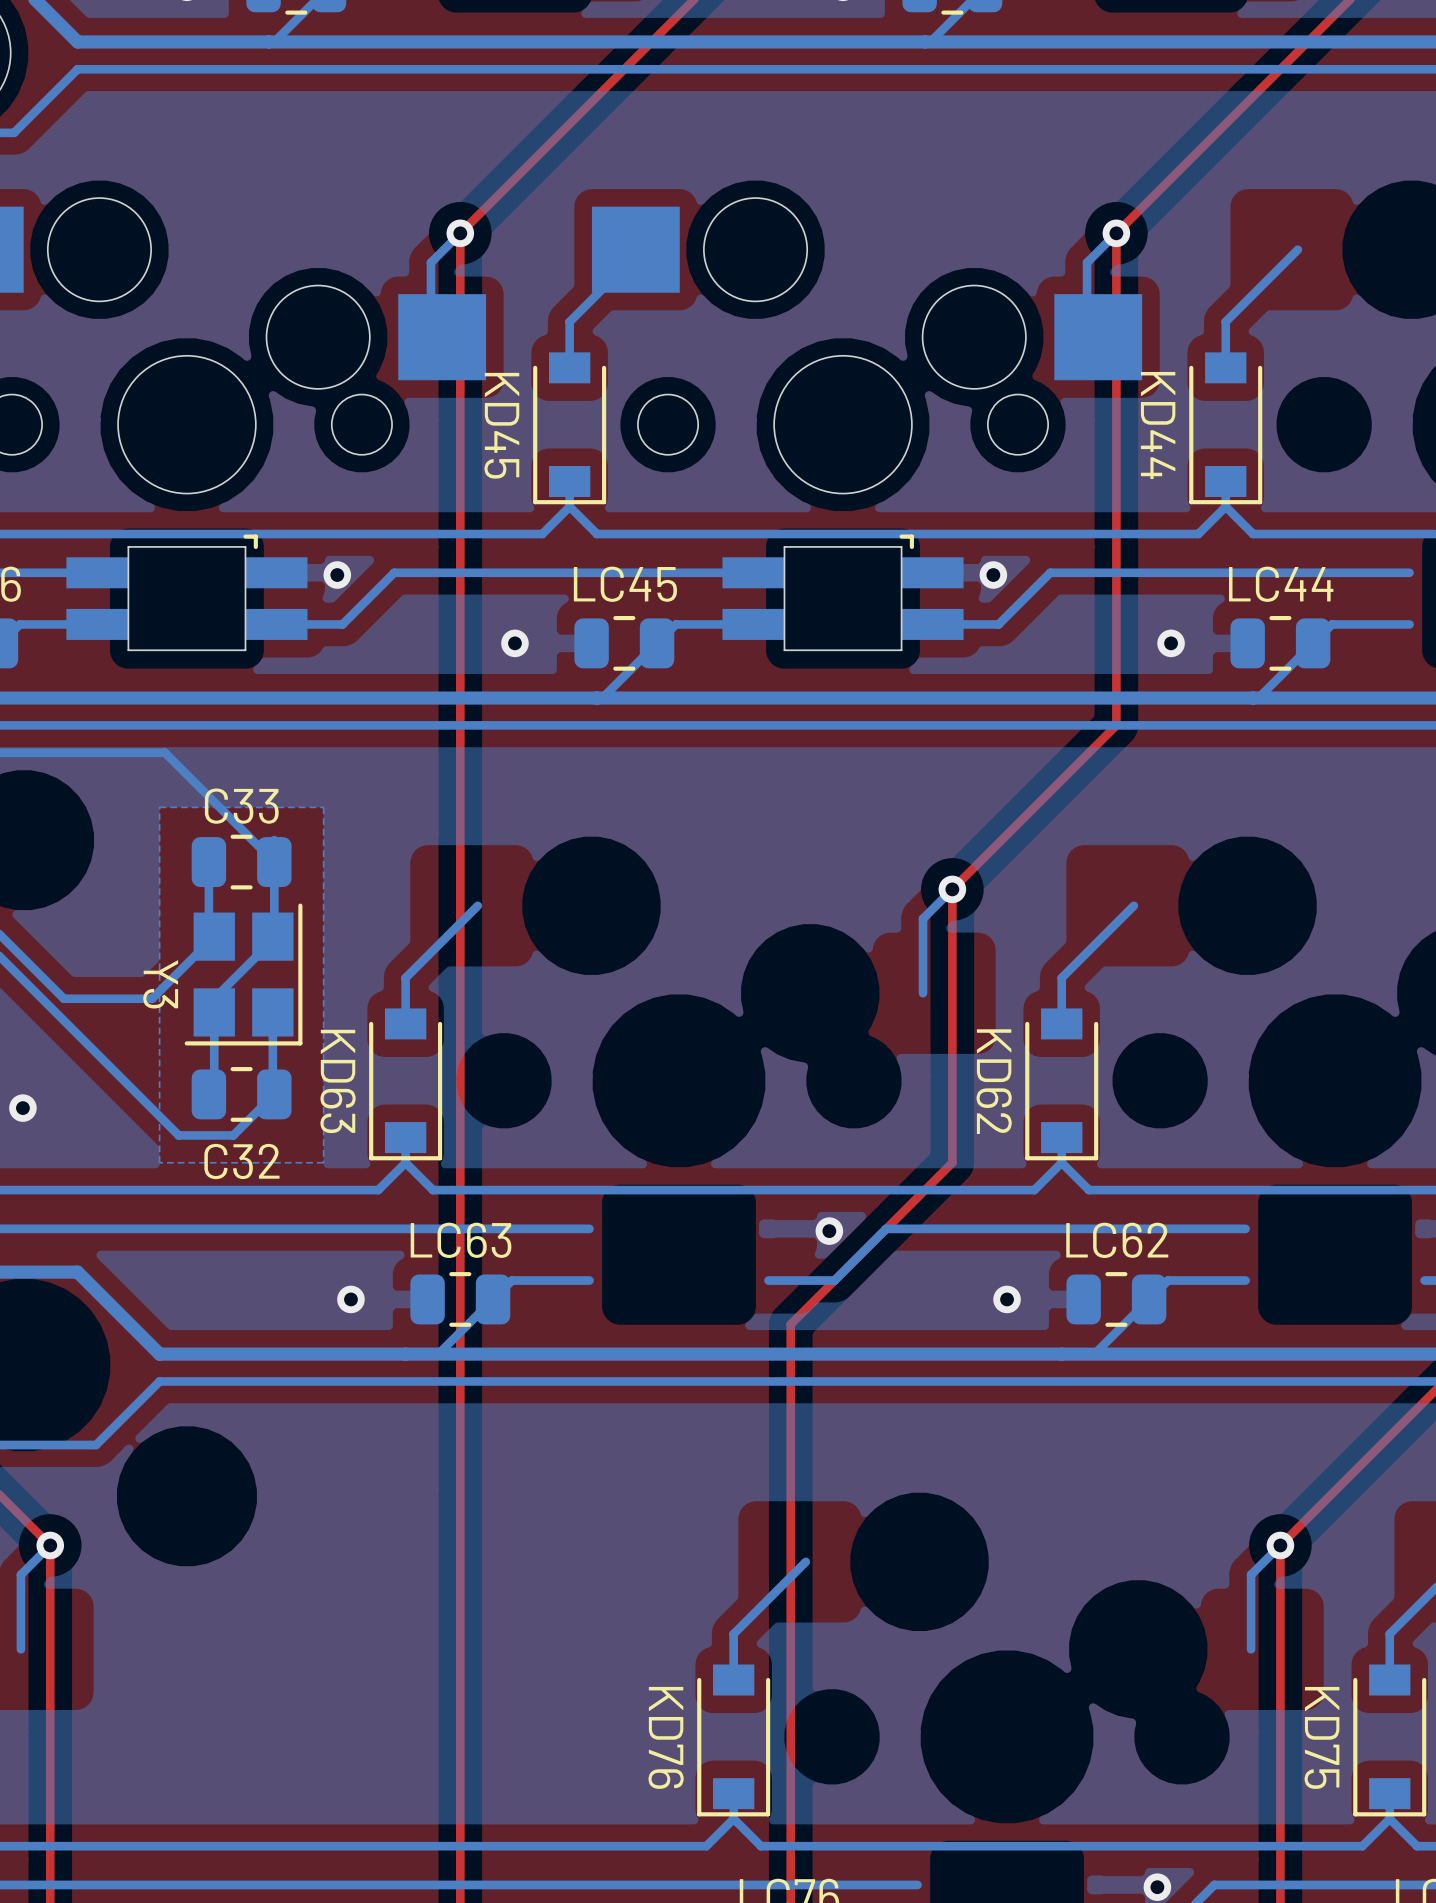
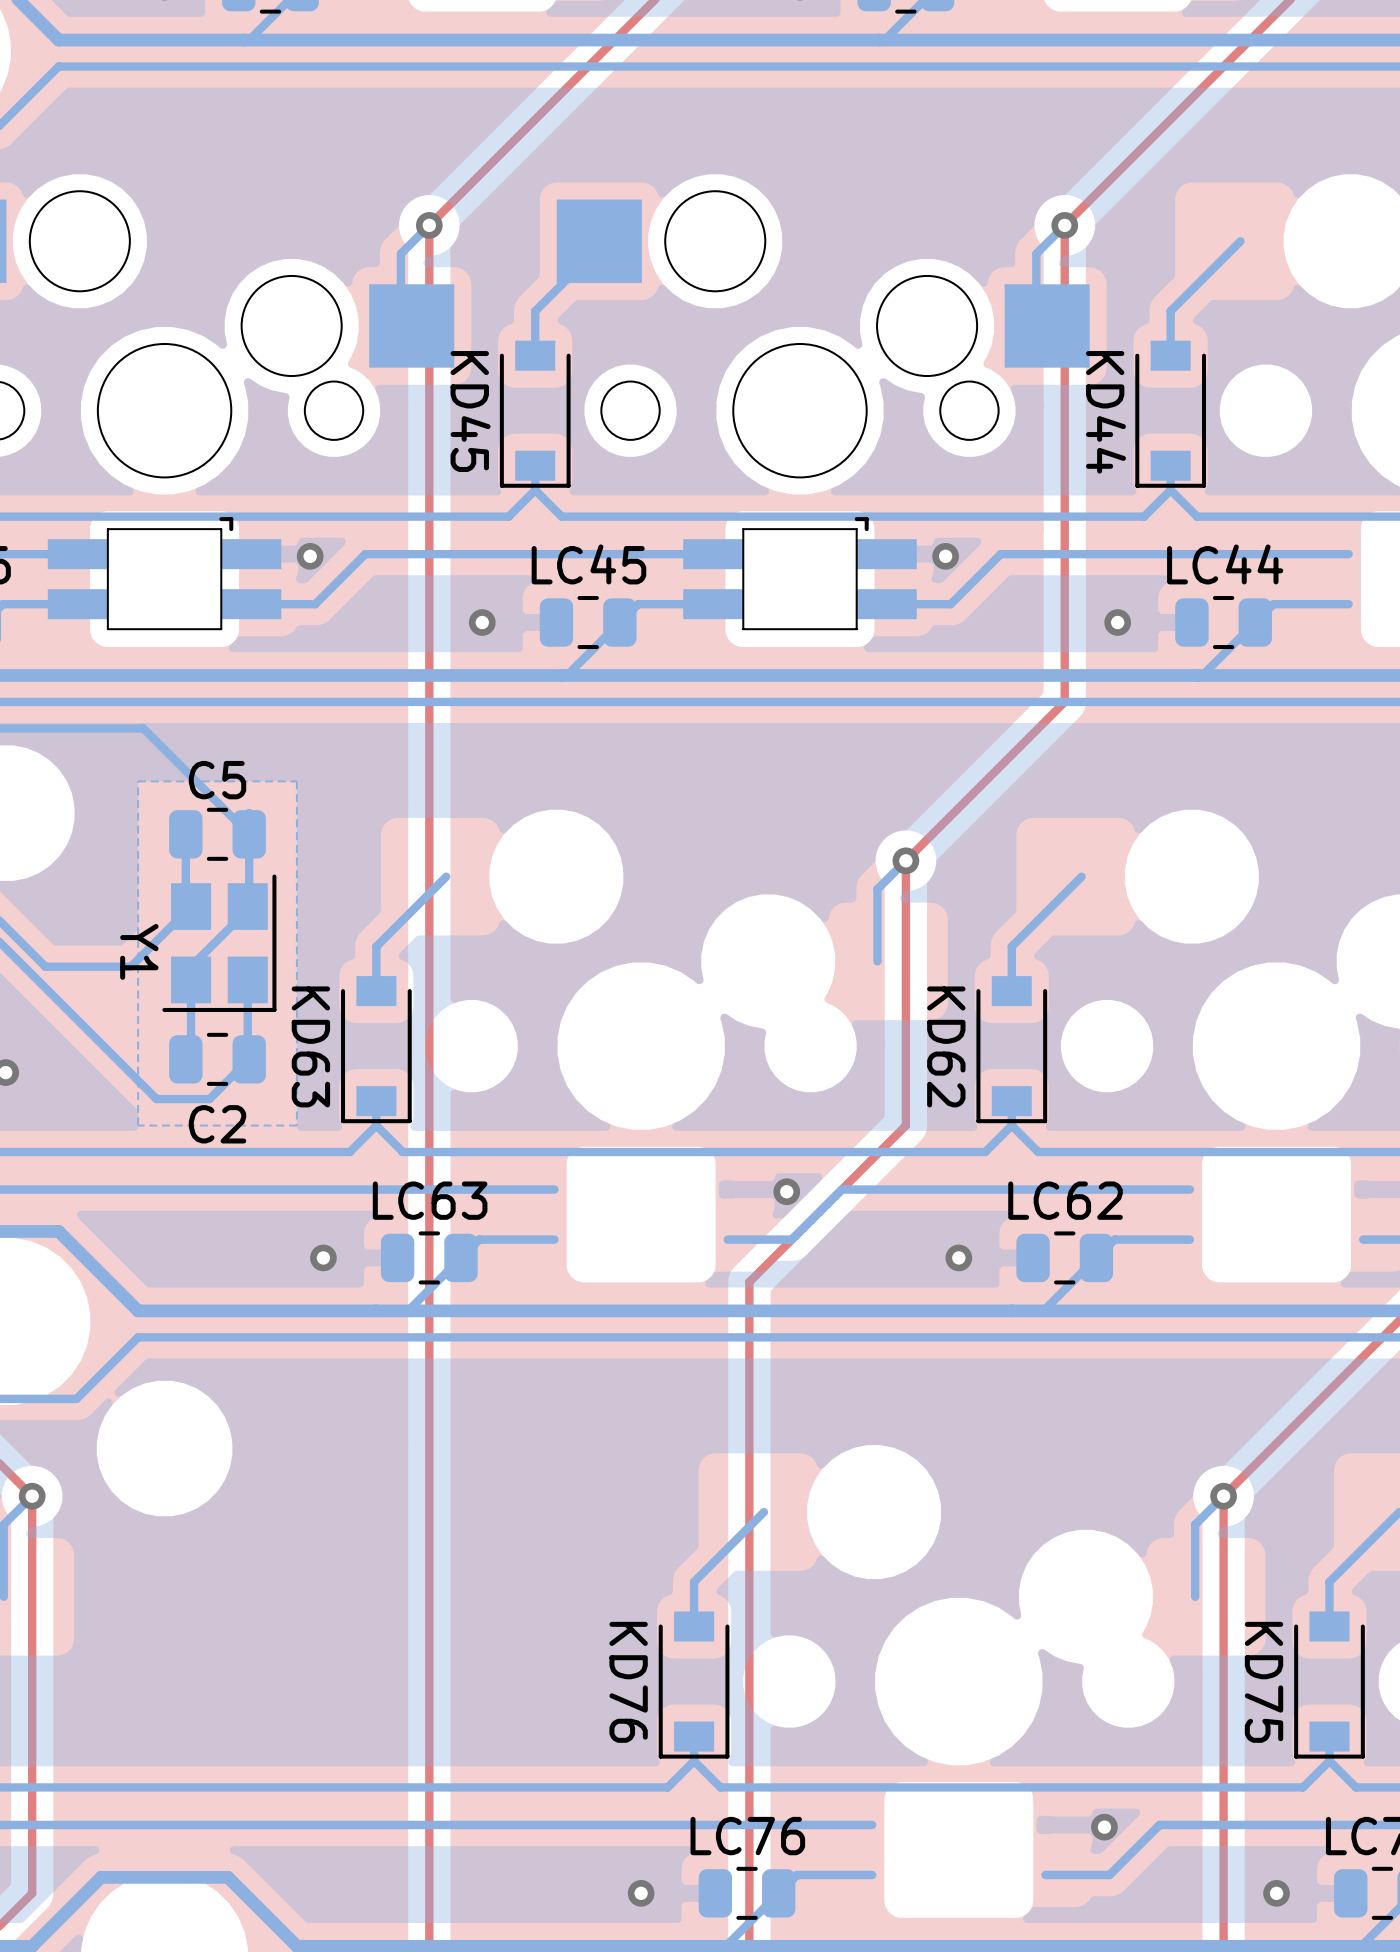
C33 name: C33 (241, 806) -> C5 (217, 780)
Y3 name: Y3 (160, 984) -> Y1 (139, 951)
C32 name: C32 (241, 1161) -> C2 (217, 1124)

